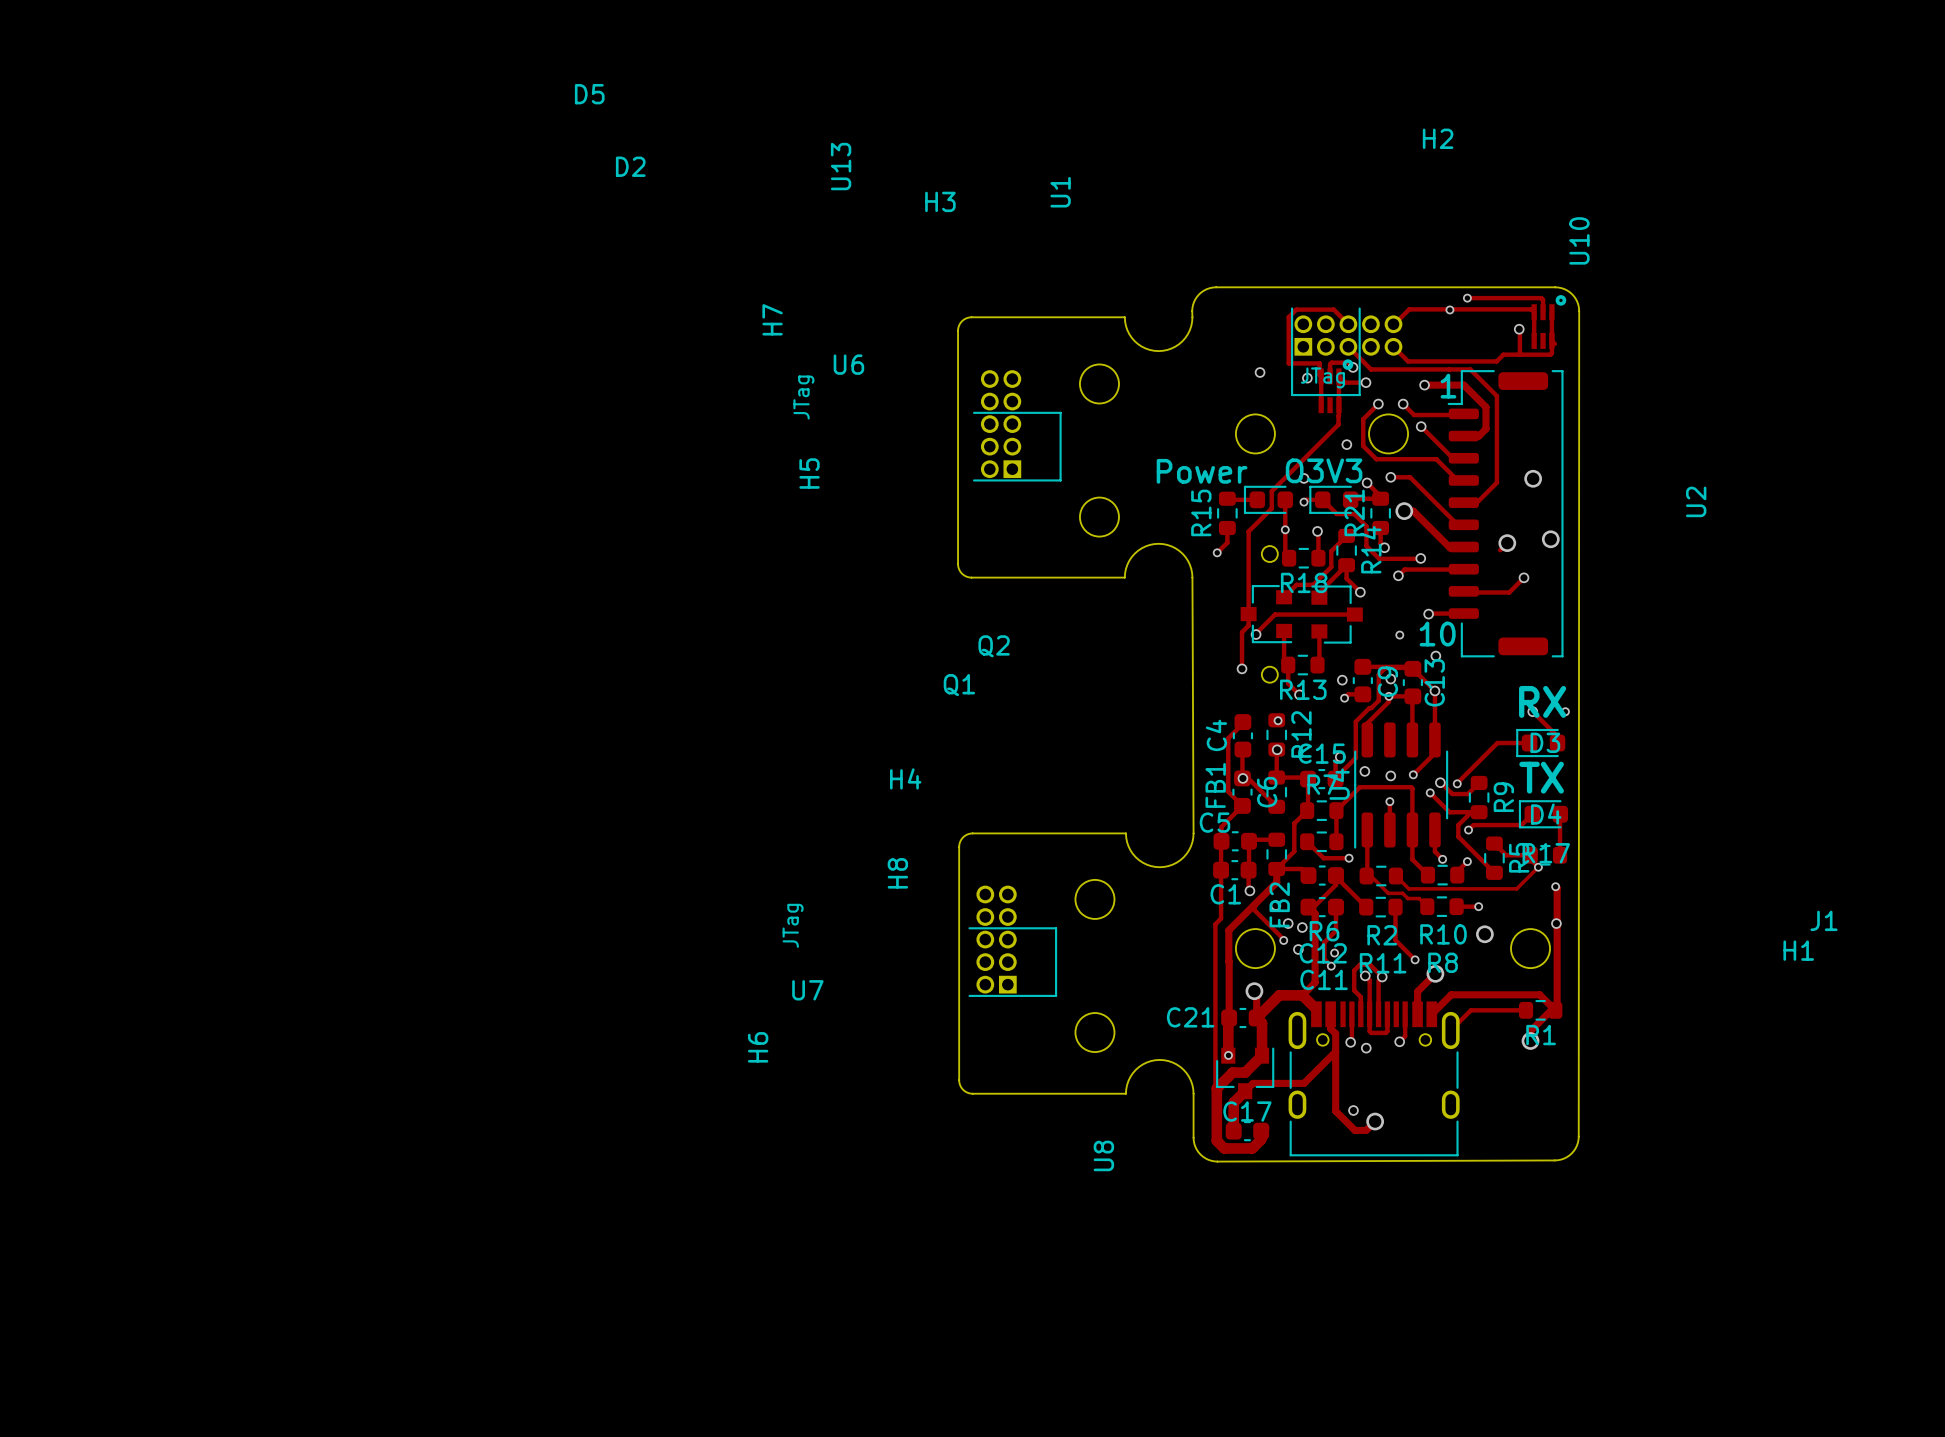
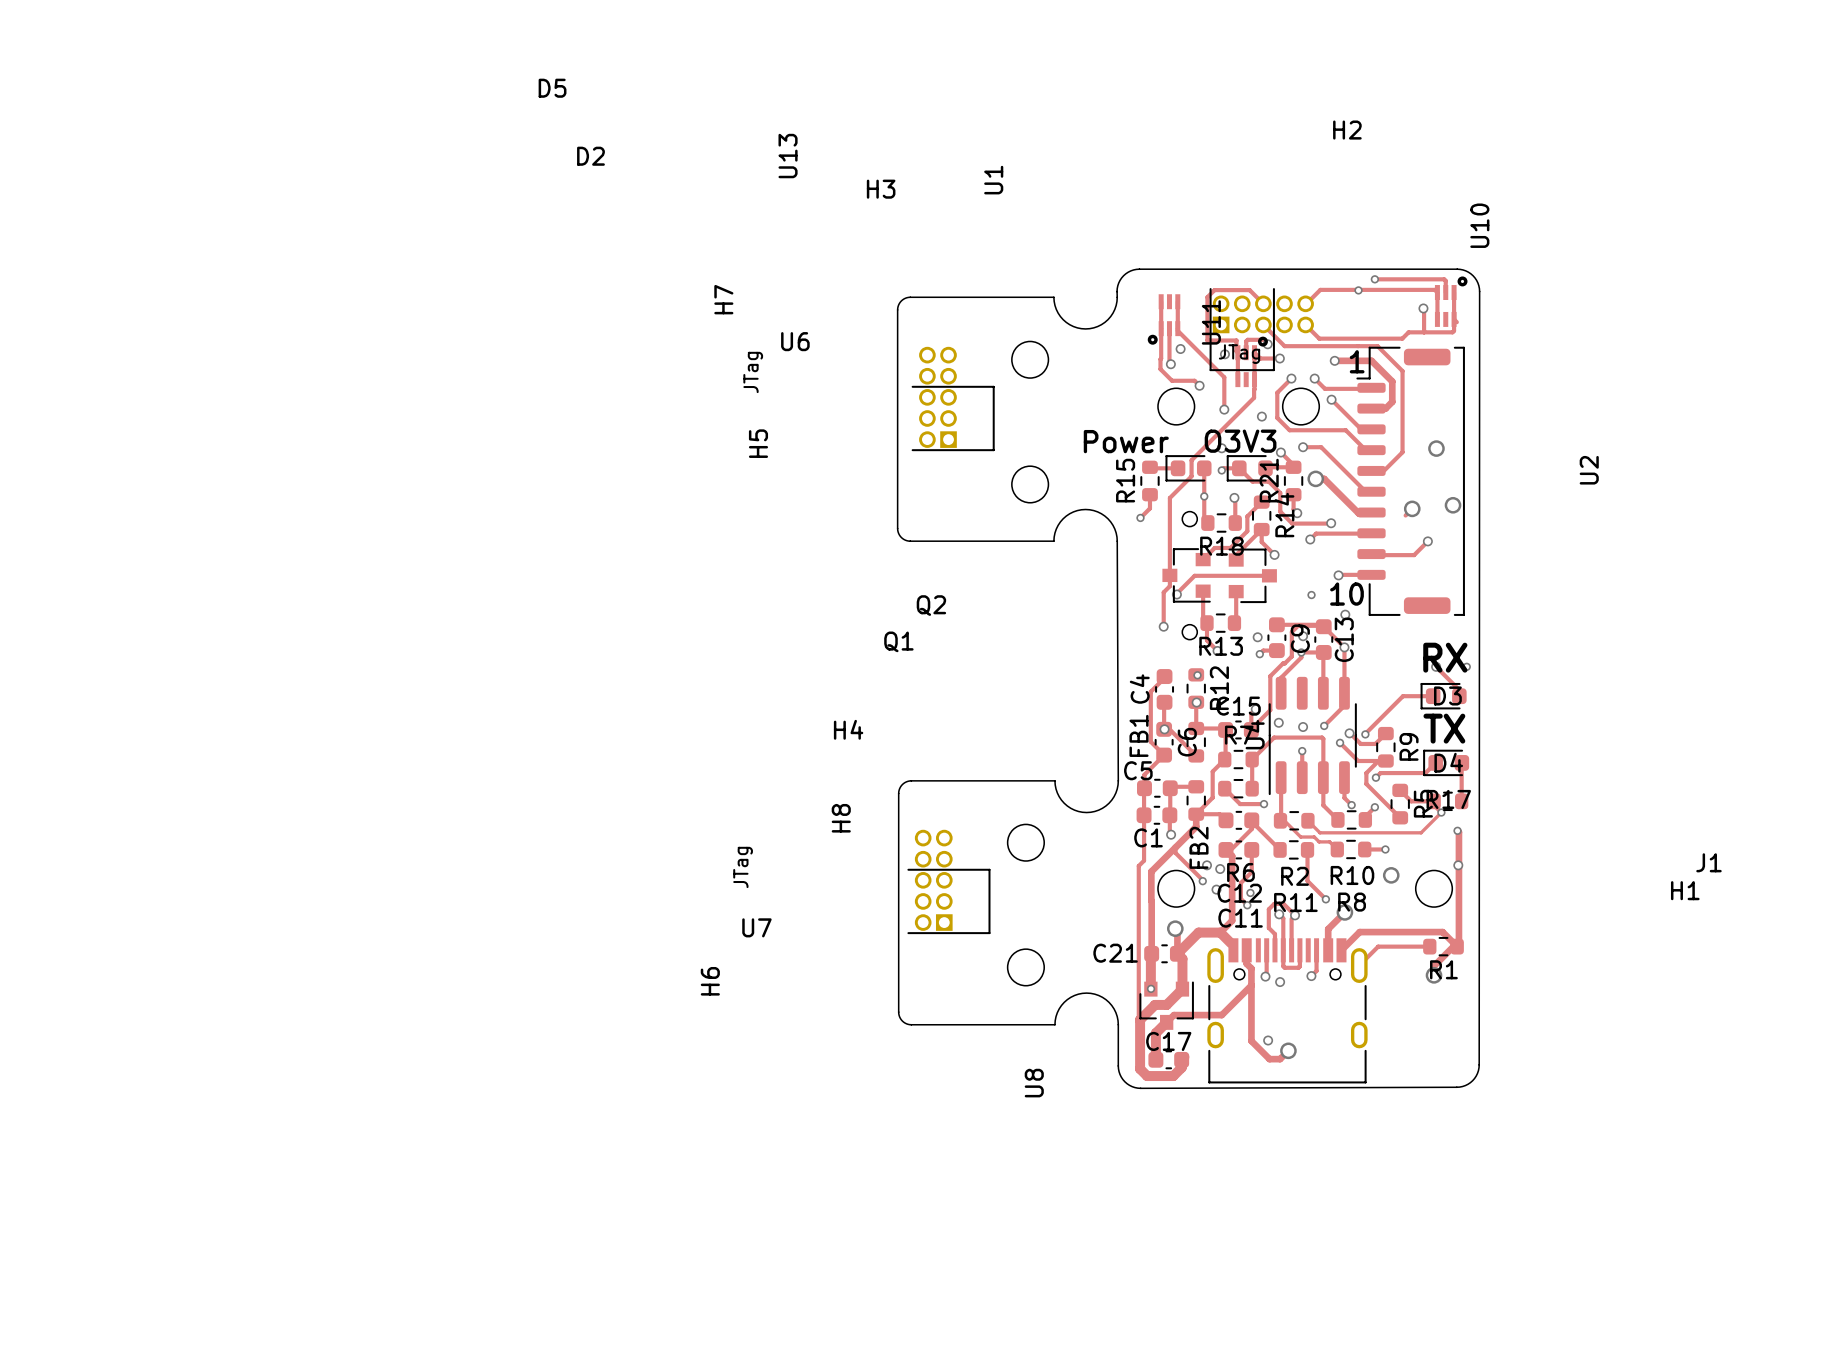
track: none -> (1161, 301) (1160, 369) (1172, 380) (1194, 380) (1199, 385)
track: none -> (1177, 301) (1177, 330) (1224, 377) (1224, 409)
U11: none -> (1164, 319)
track: none -> (1169, 328) (1170, 364)
via: none -> (1170, 364)
via: none -> (1199, 385)
via: none -> (1224, 409)

